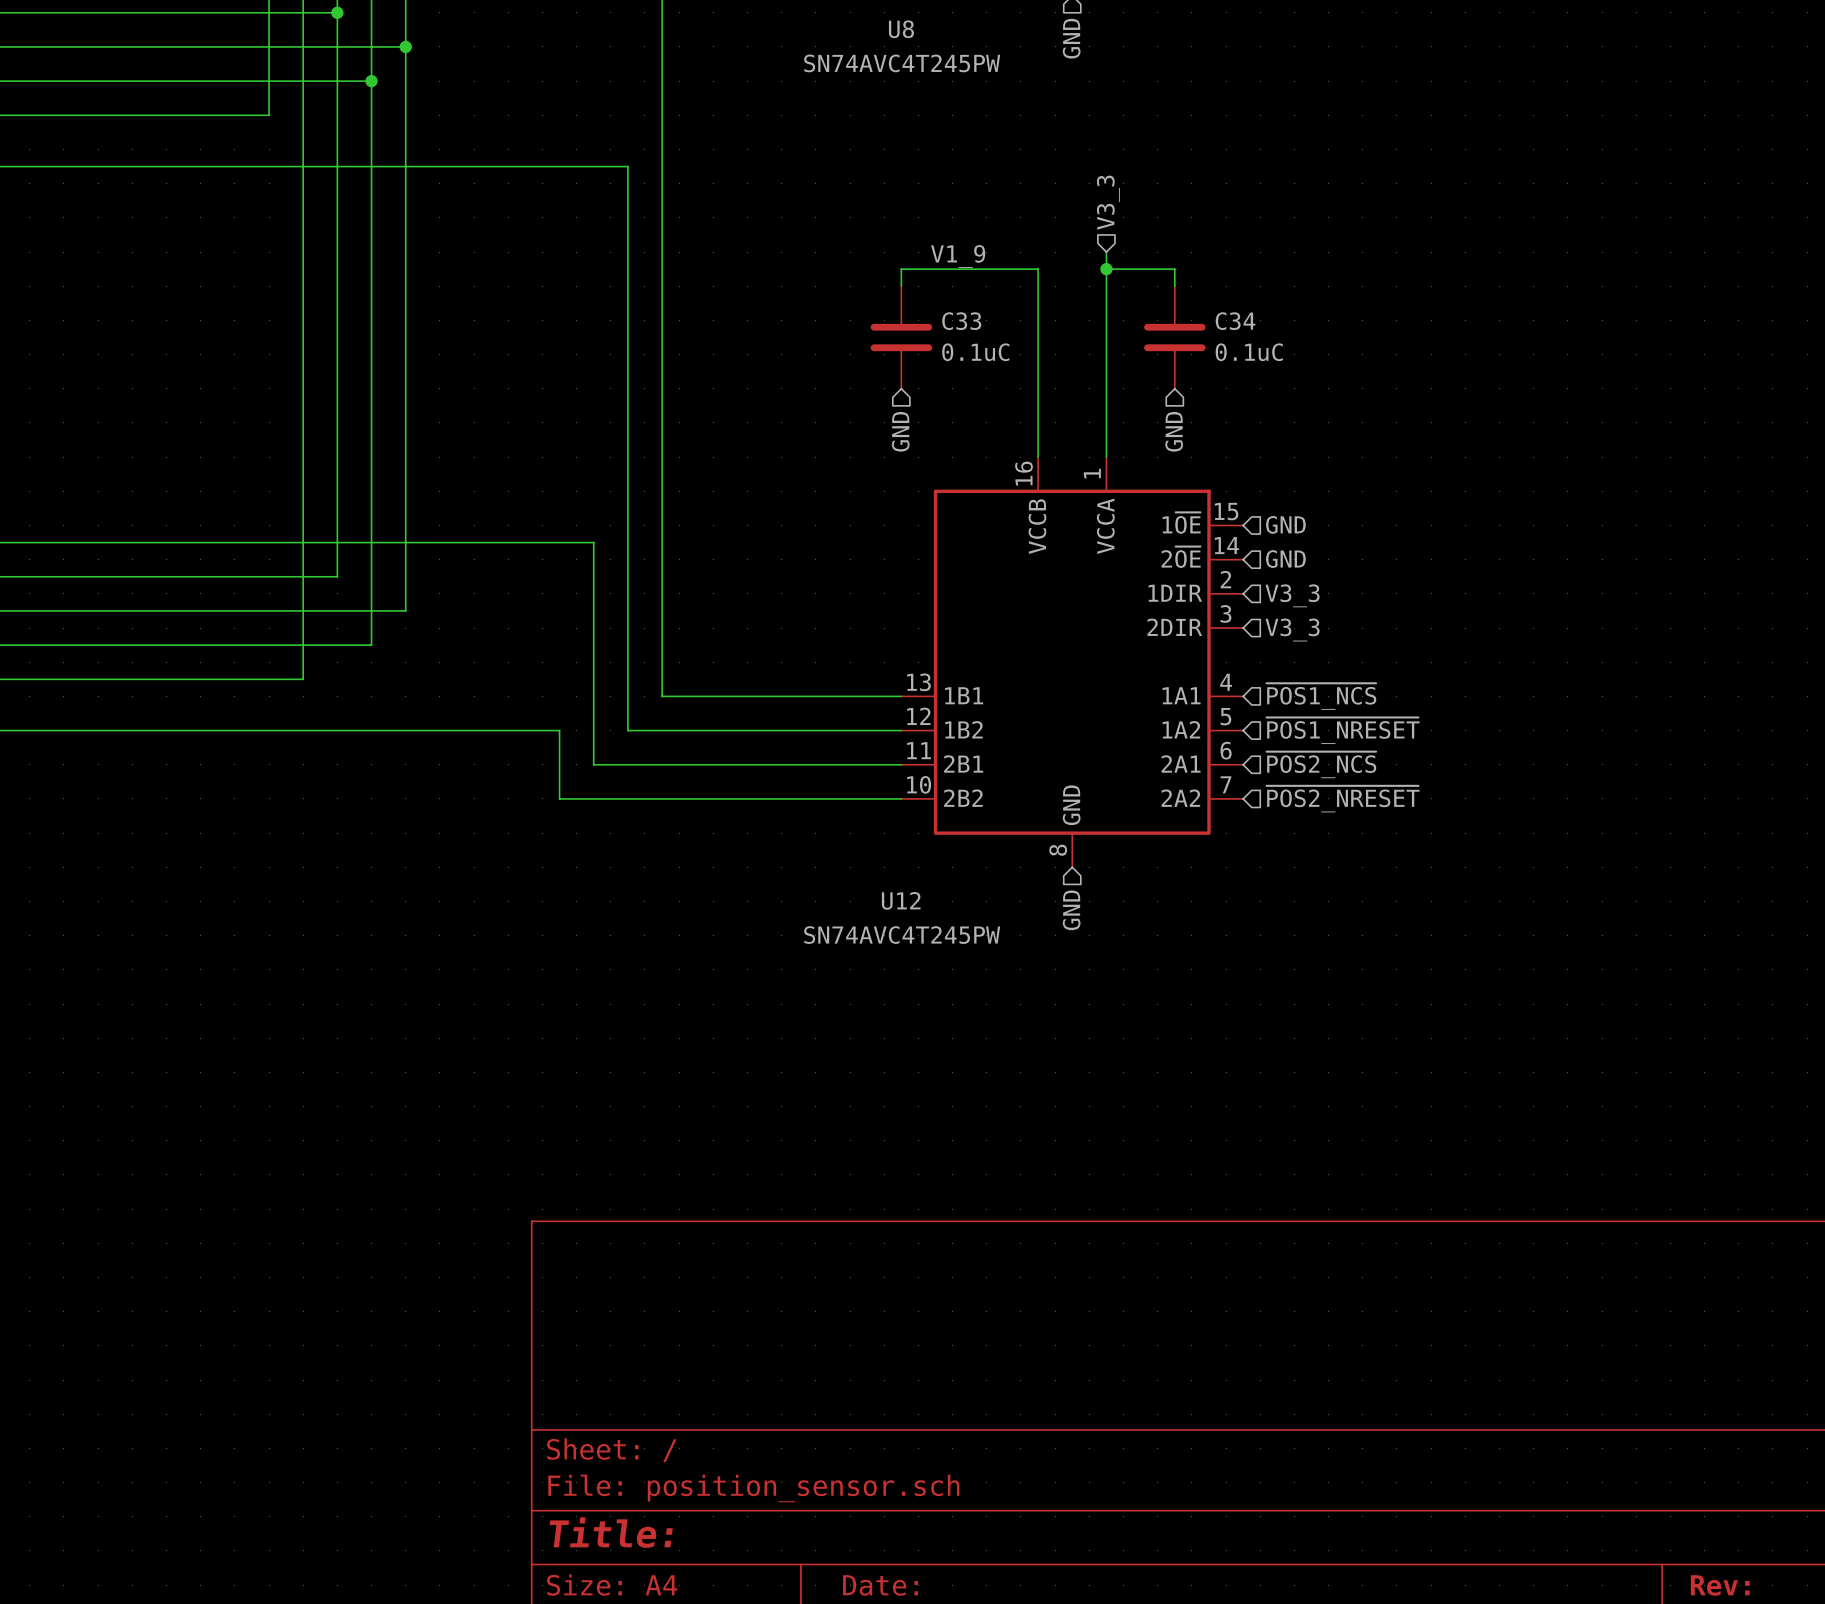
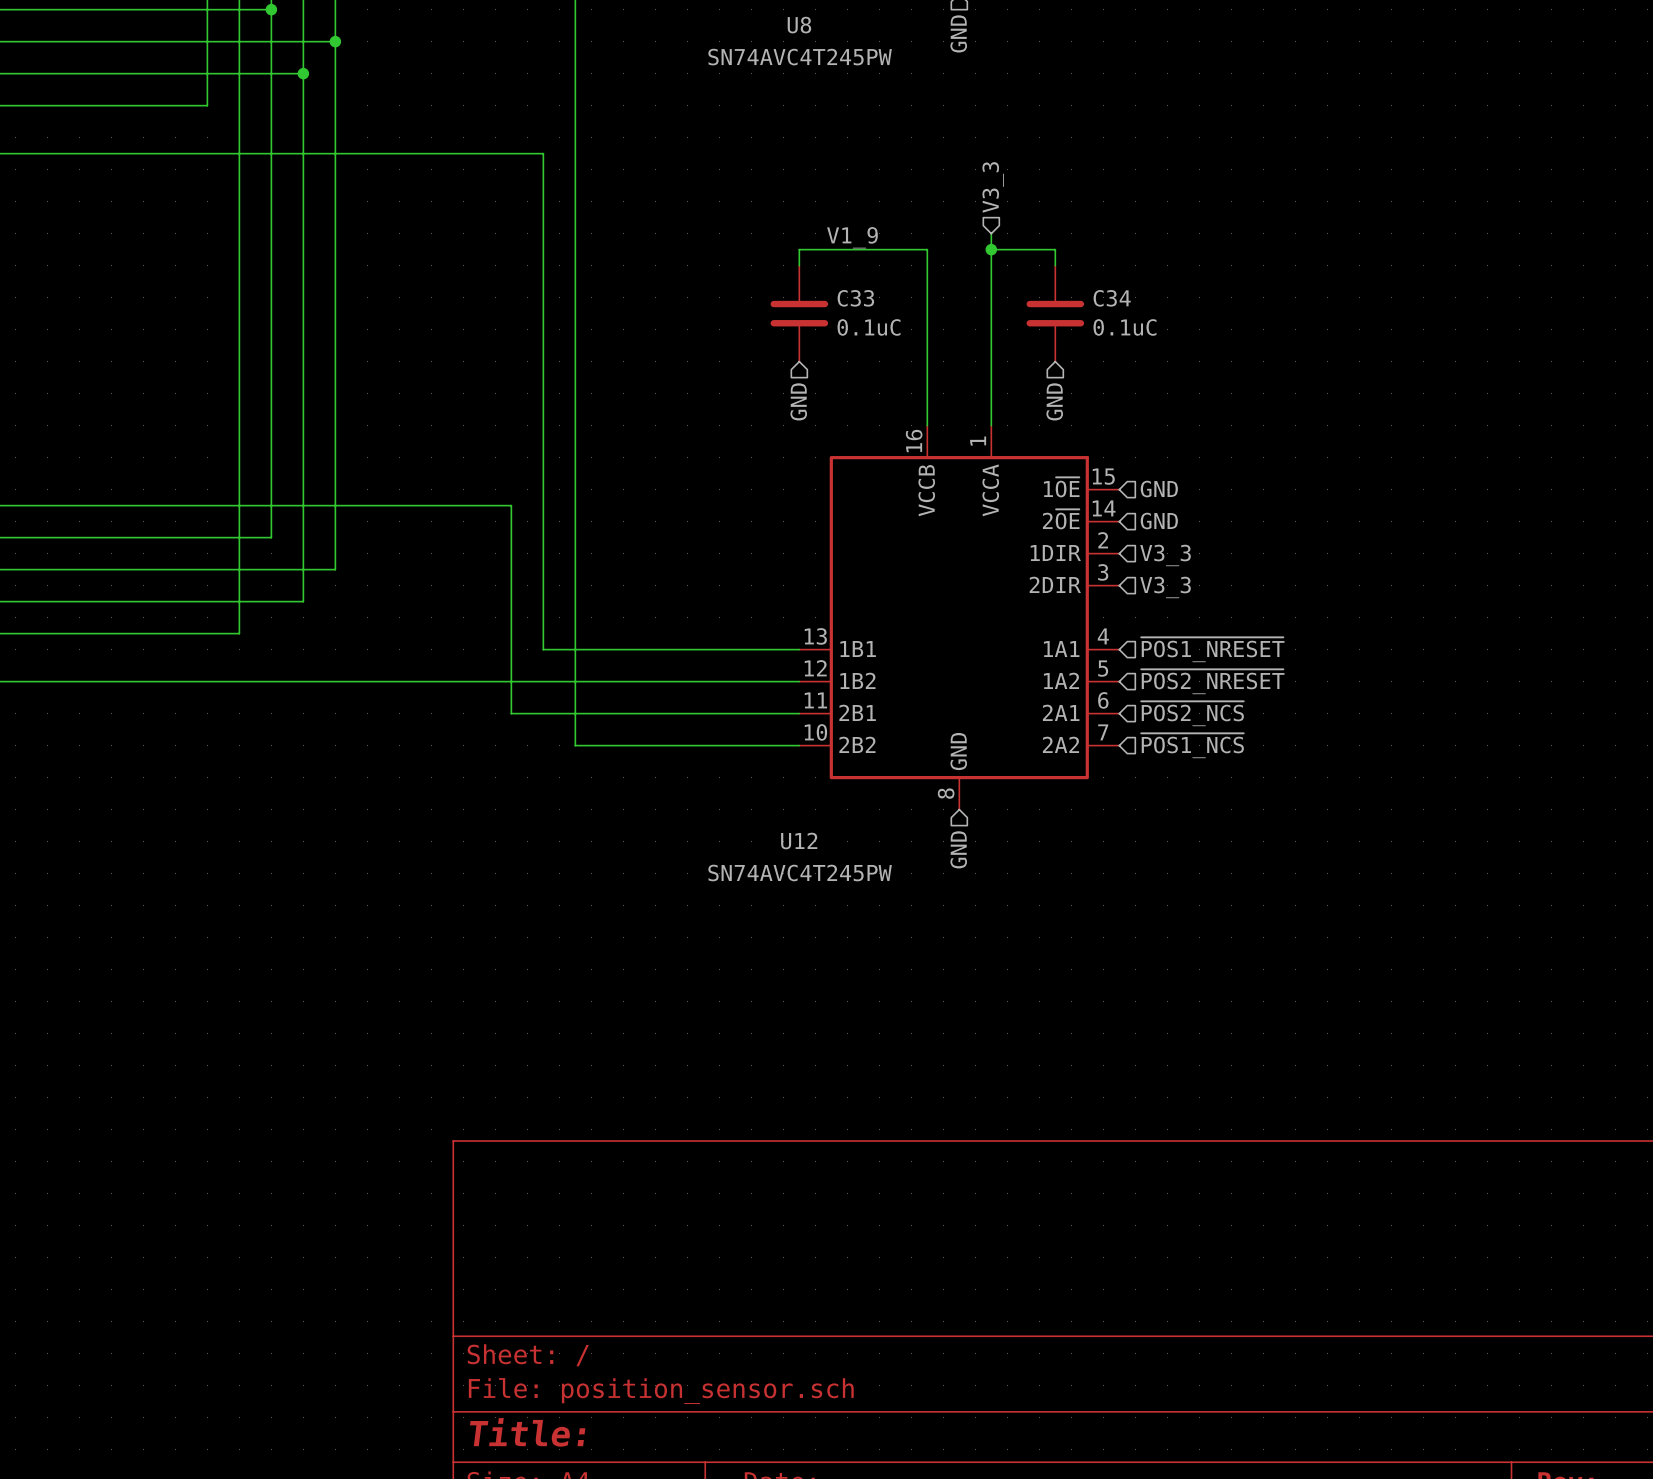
wire: (627, 696) (627, 730) -> (543, 649) (575, 649) (575, 745)
hierarchical label: ~{POS1_NCS} (1321, 696) -> ~{POS1_NRESET} (1212, 649)
wire: (559, 730) (559, 798) (662, 798) -> (479, 681) (543, 681)
hierarchical label: ~{POS1_NRESET} (1343, 730) -> ~{POS2_NRESET} (1212, 681)
hierarchical label: ~{POS2_NRESET} (1343, 799) -> ~{POS1_NCS} (1192, 745)

